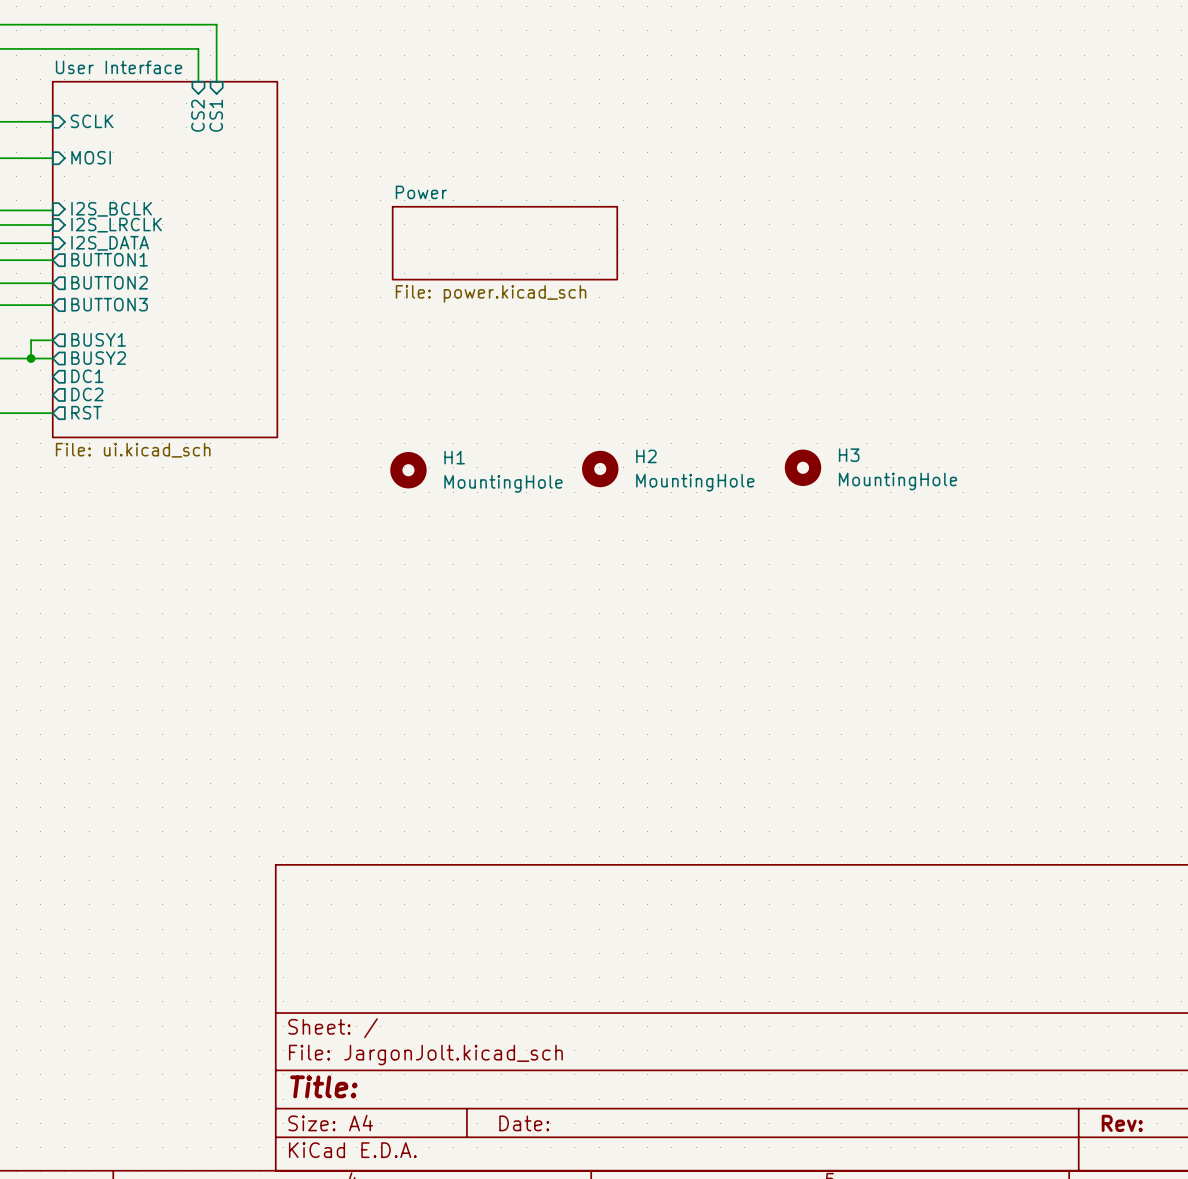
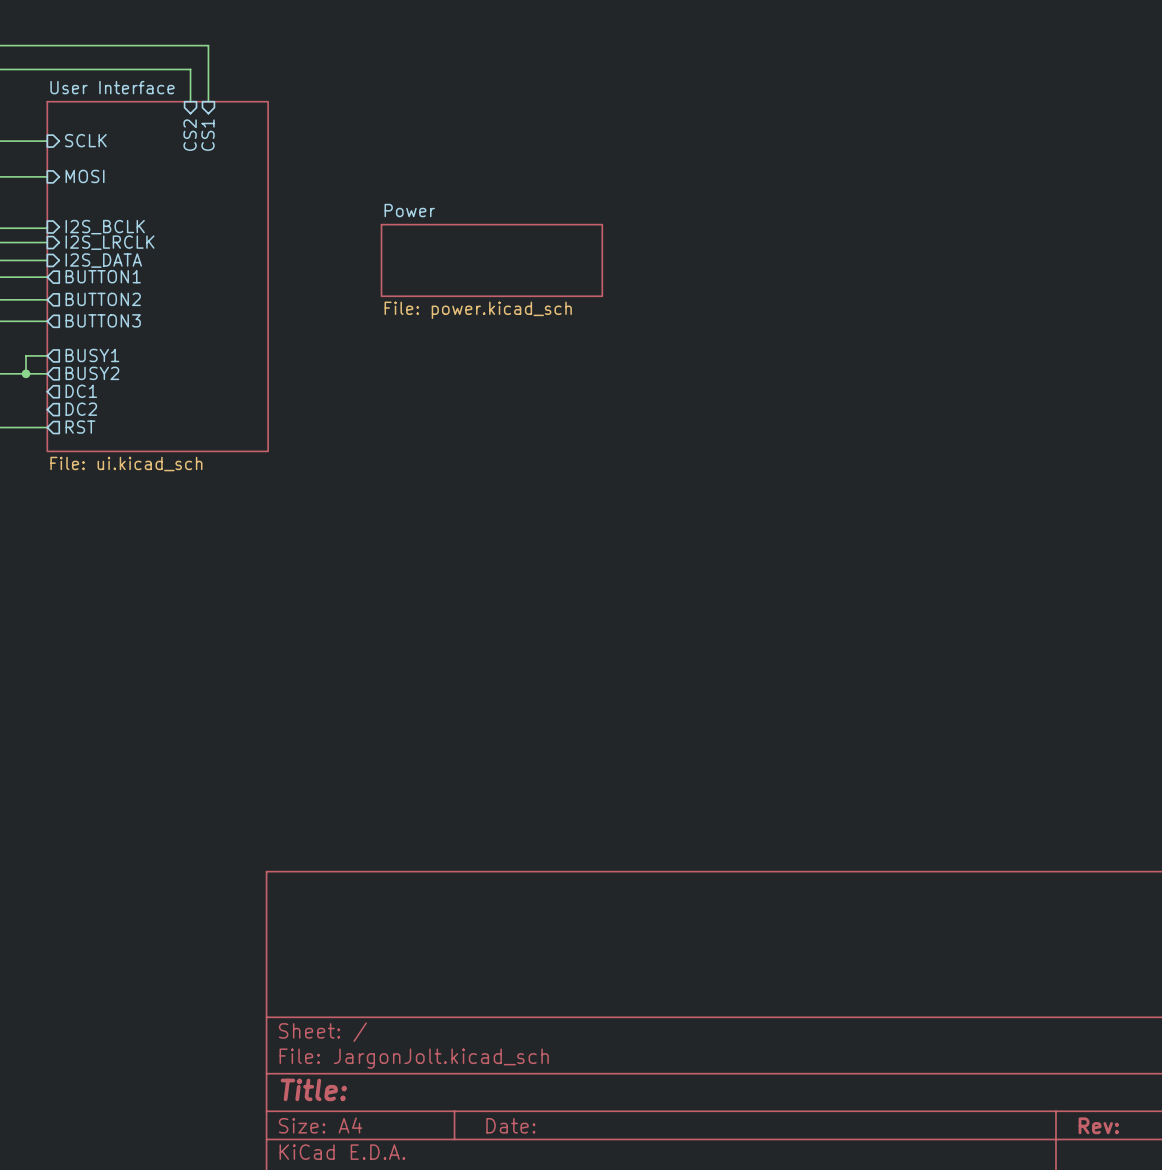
H3: MountingHole (803, 467) -> none
H2: MountingHole (600, 469) -> none
H1: MountingHole (408, 470) -> none

